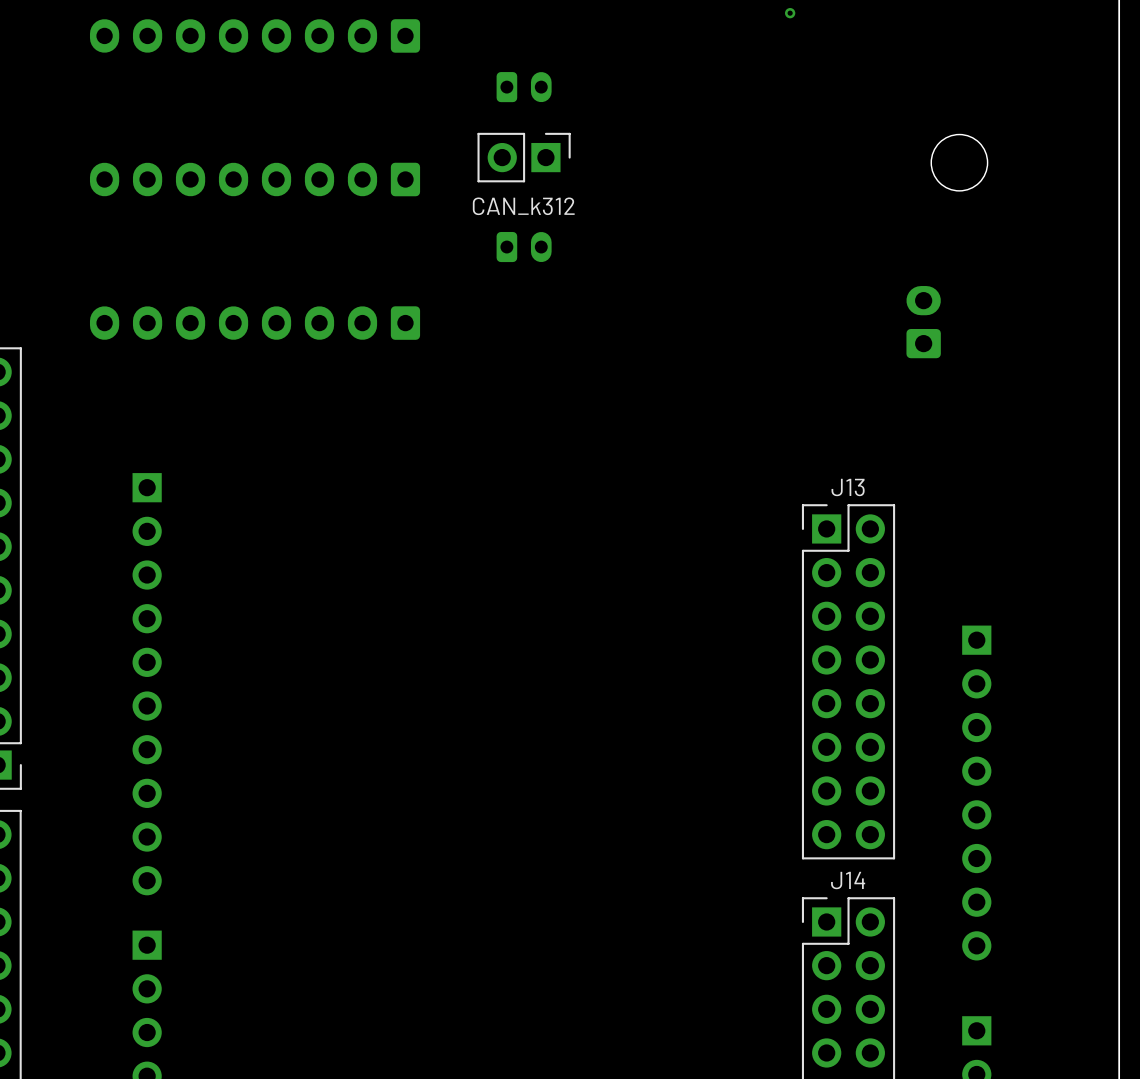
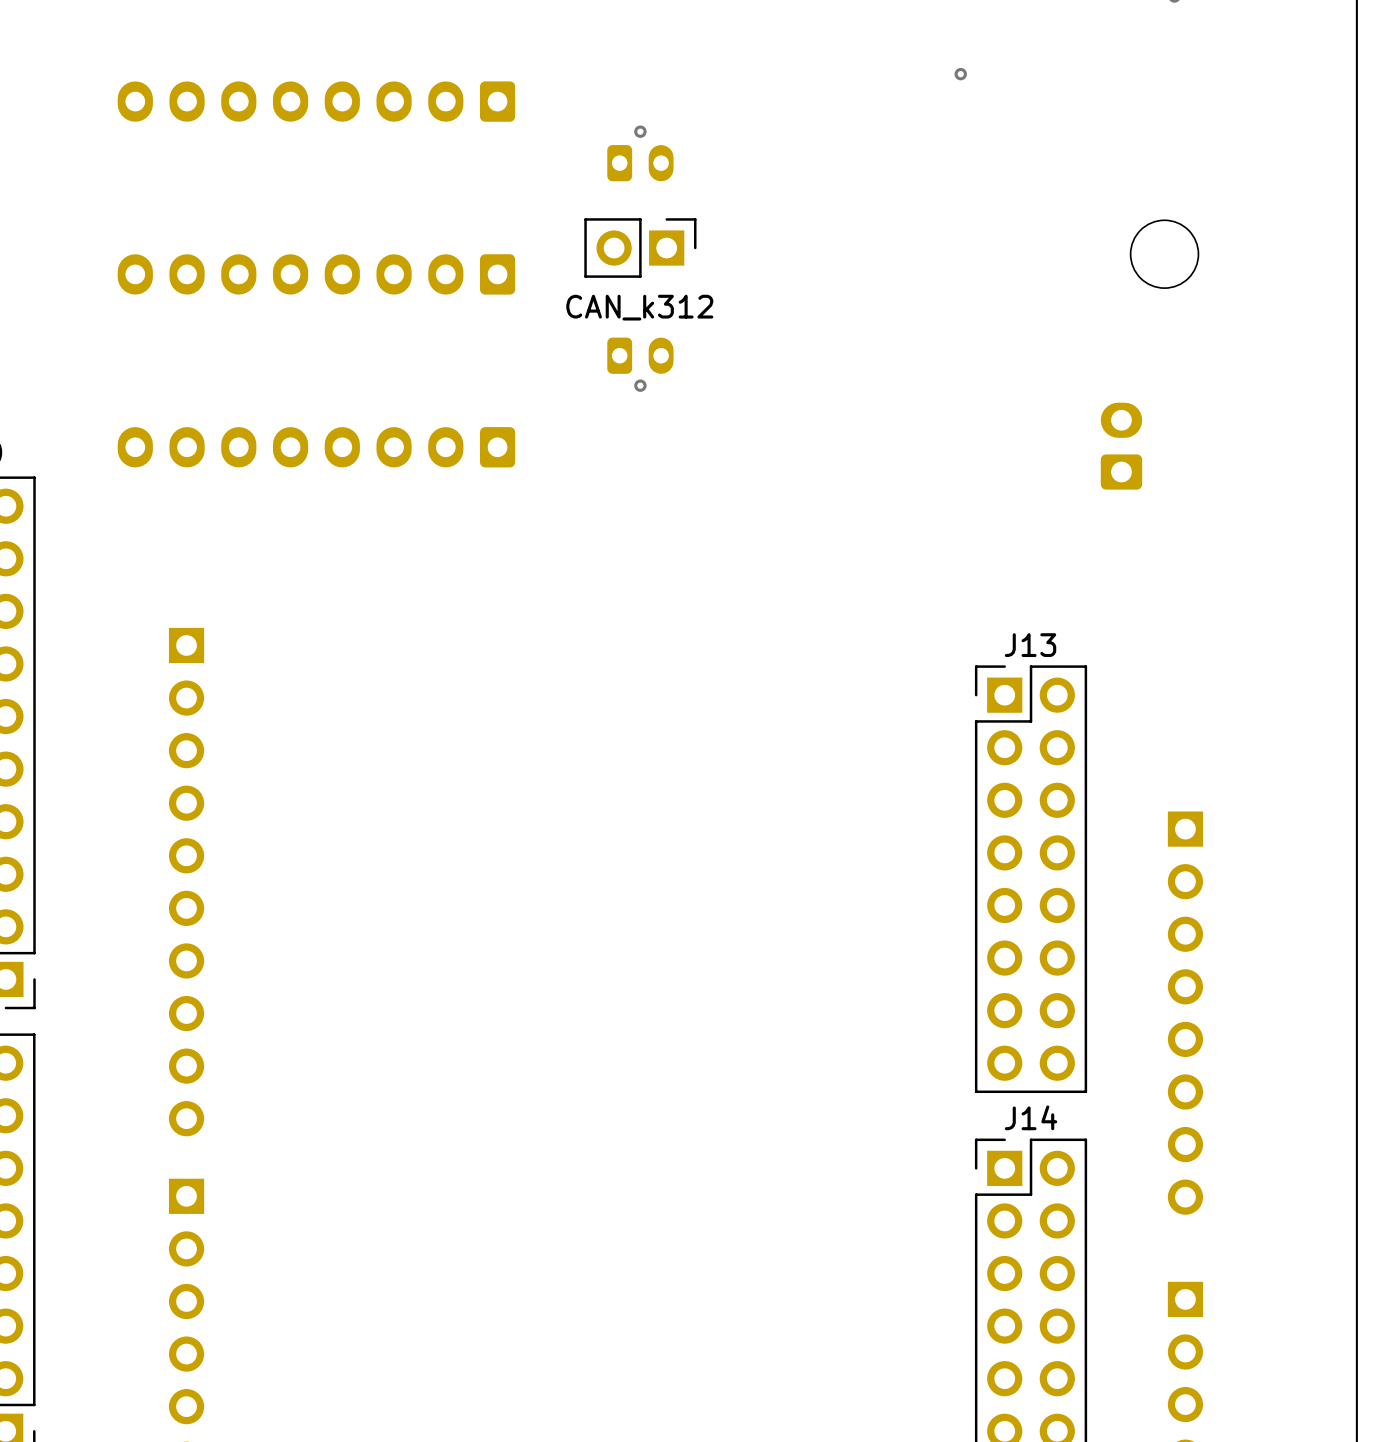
via: none -> (640, 131)
via: none -> (640, 385)

